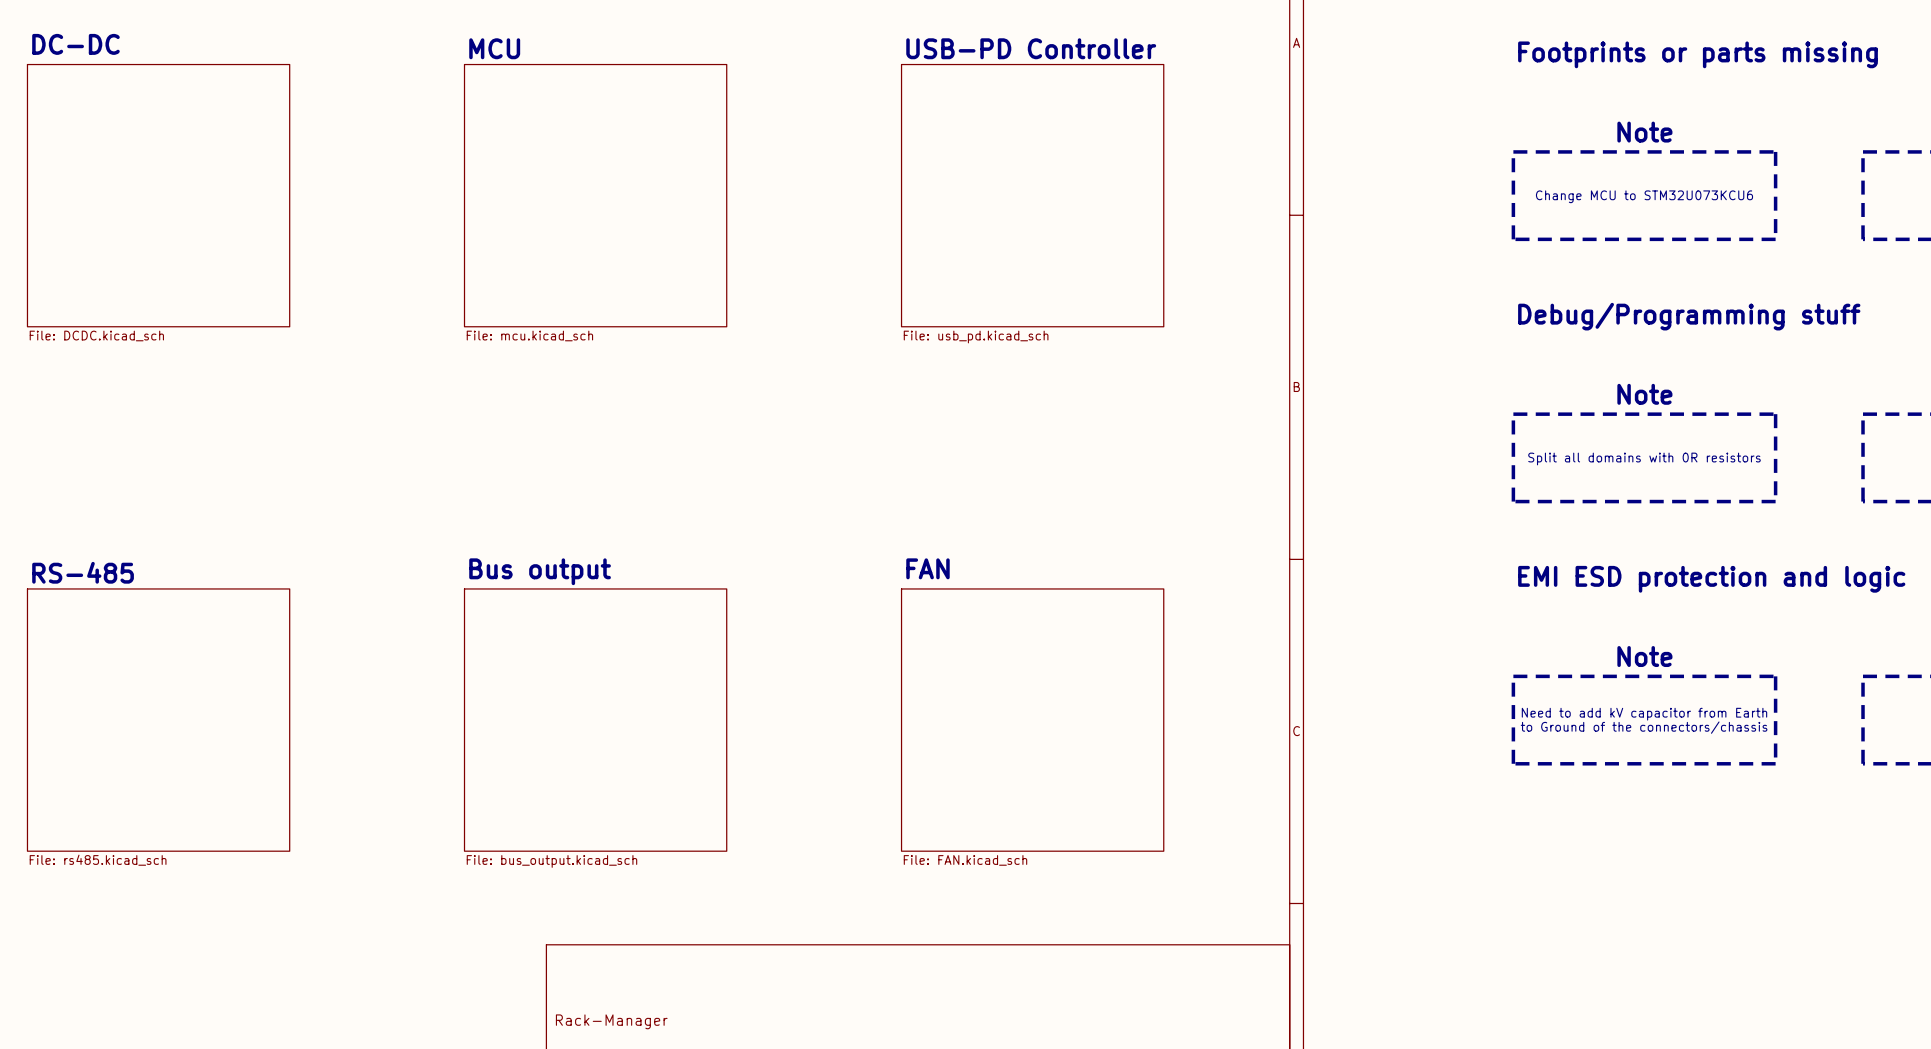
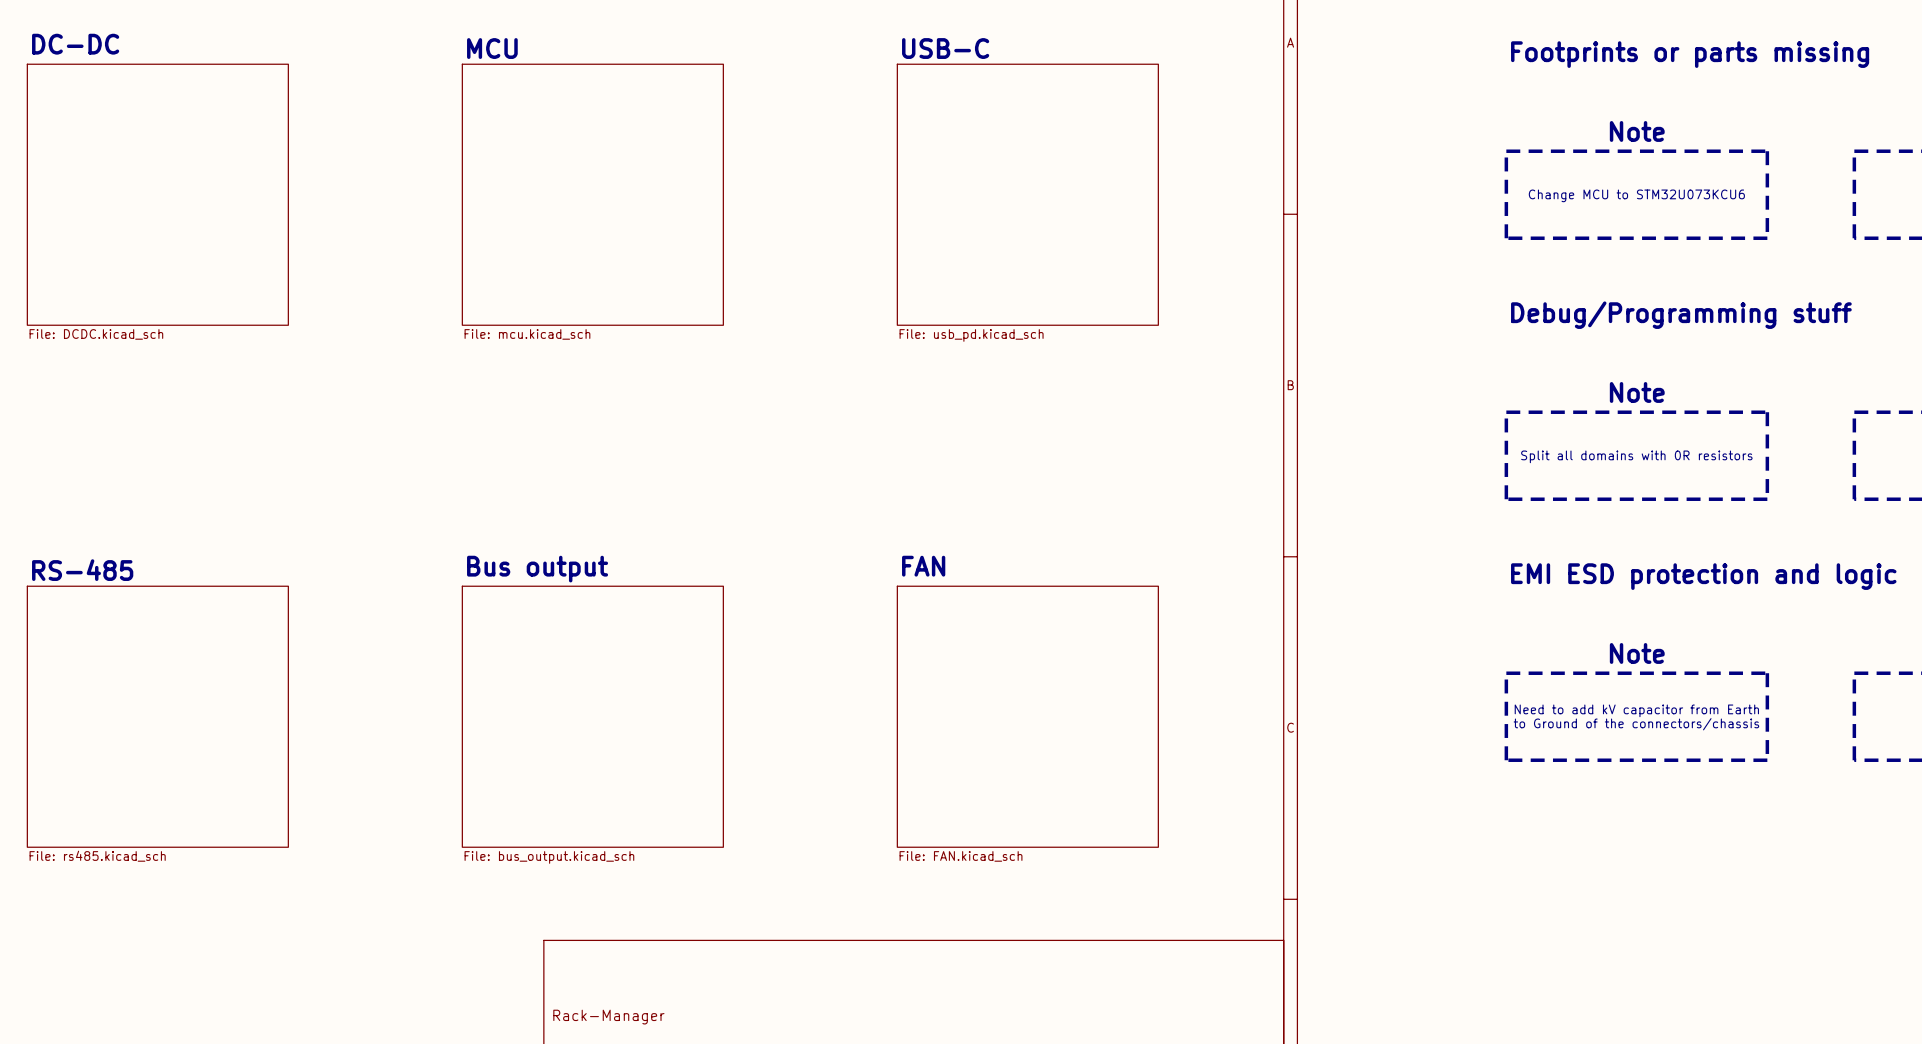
sheet USB-PD Controller name: USB-PD Controller (1031, 48) -> USB-C (945, 48)

